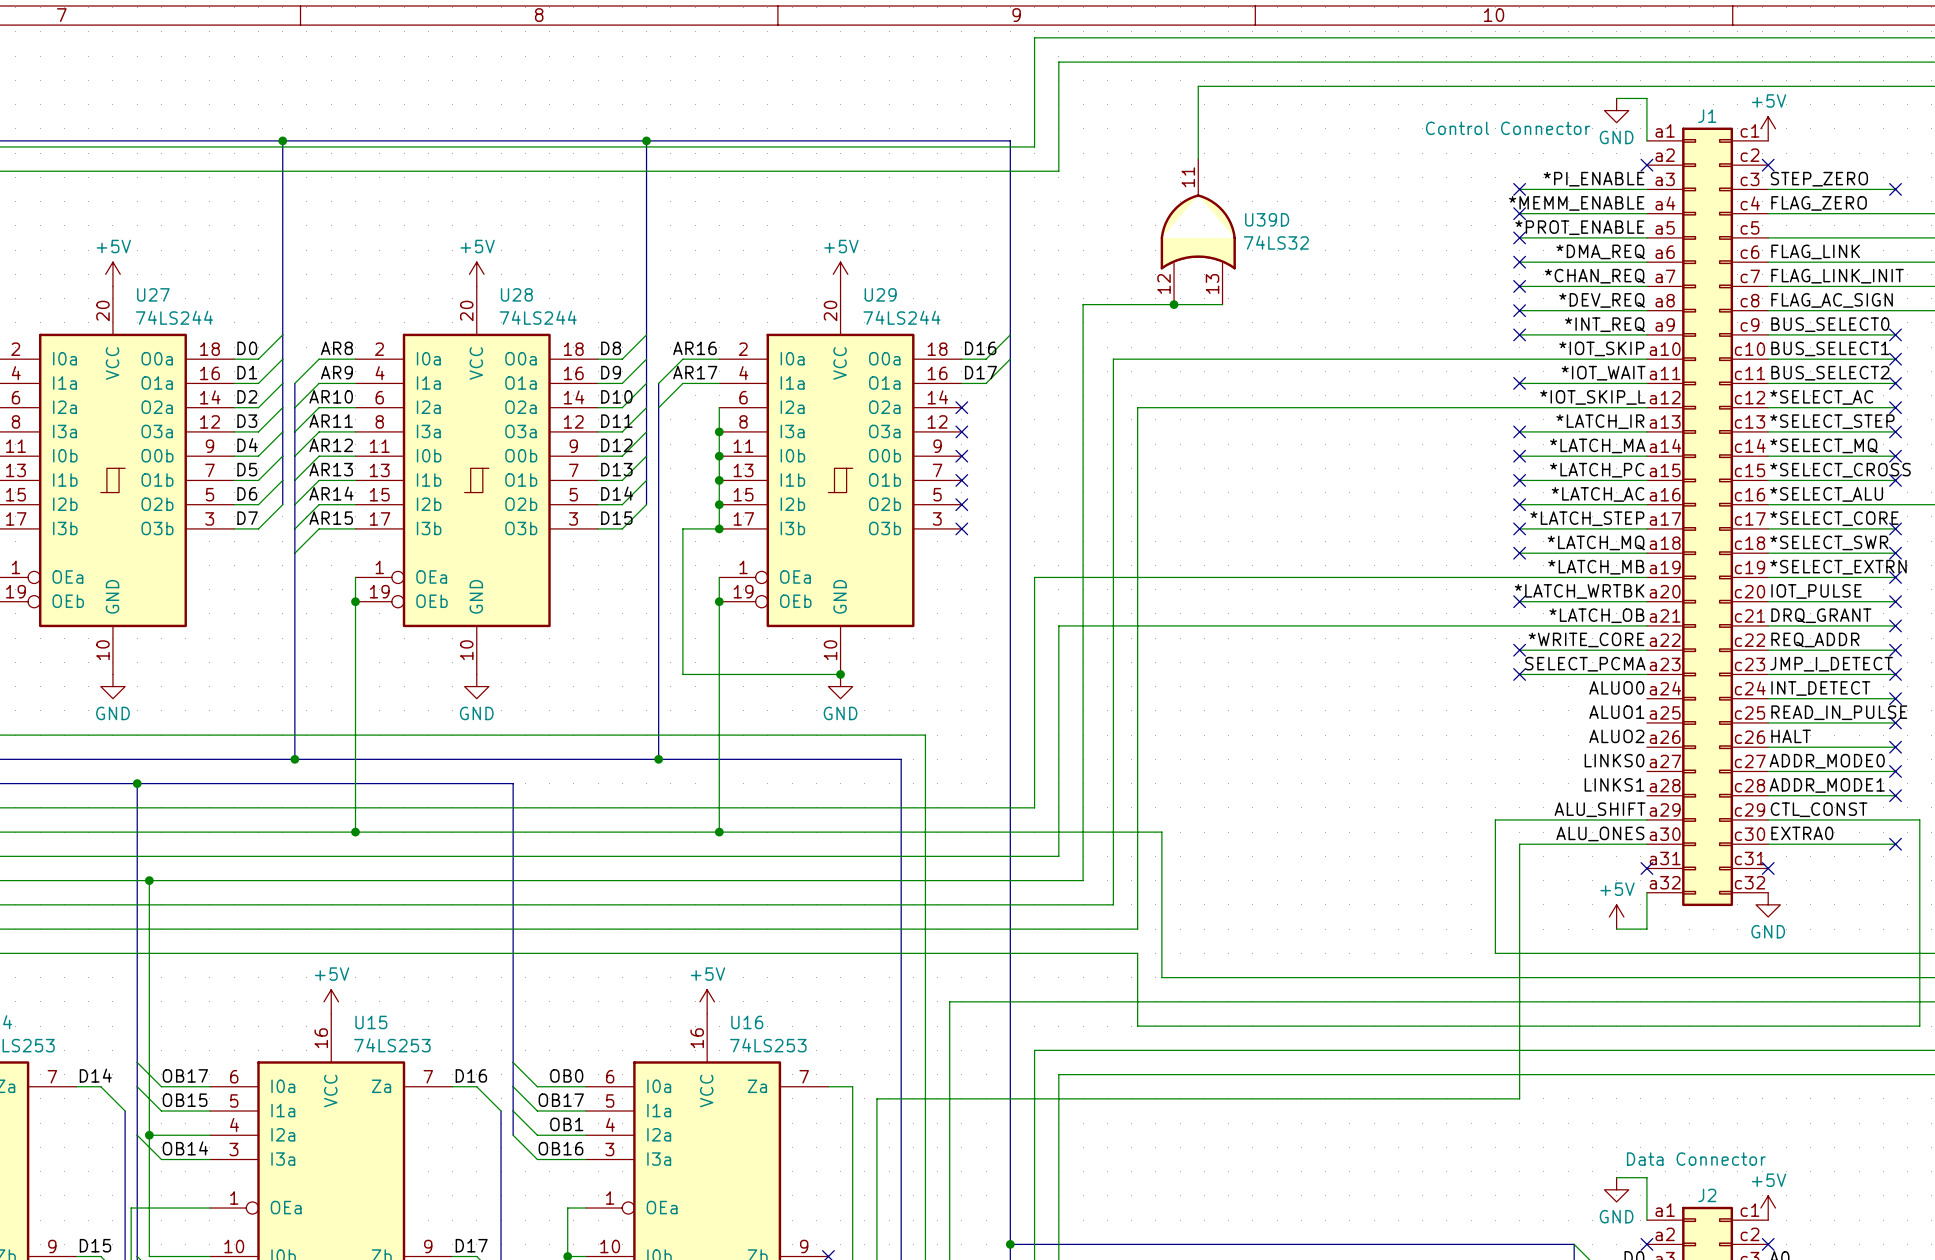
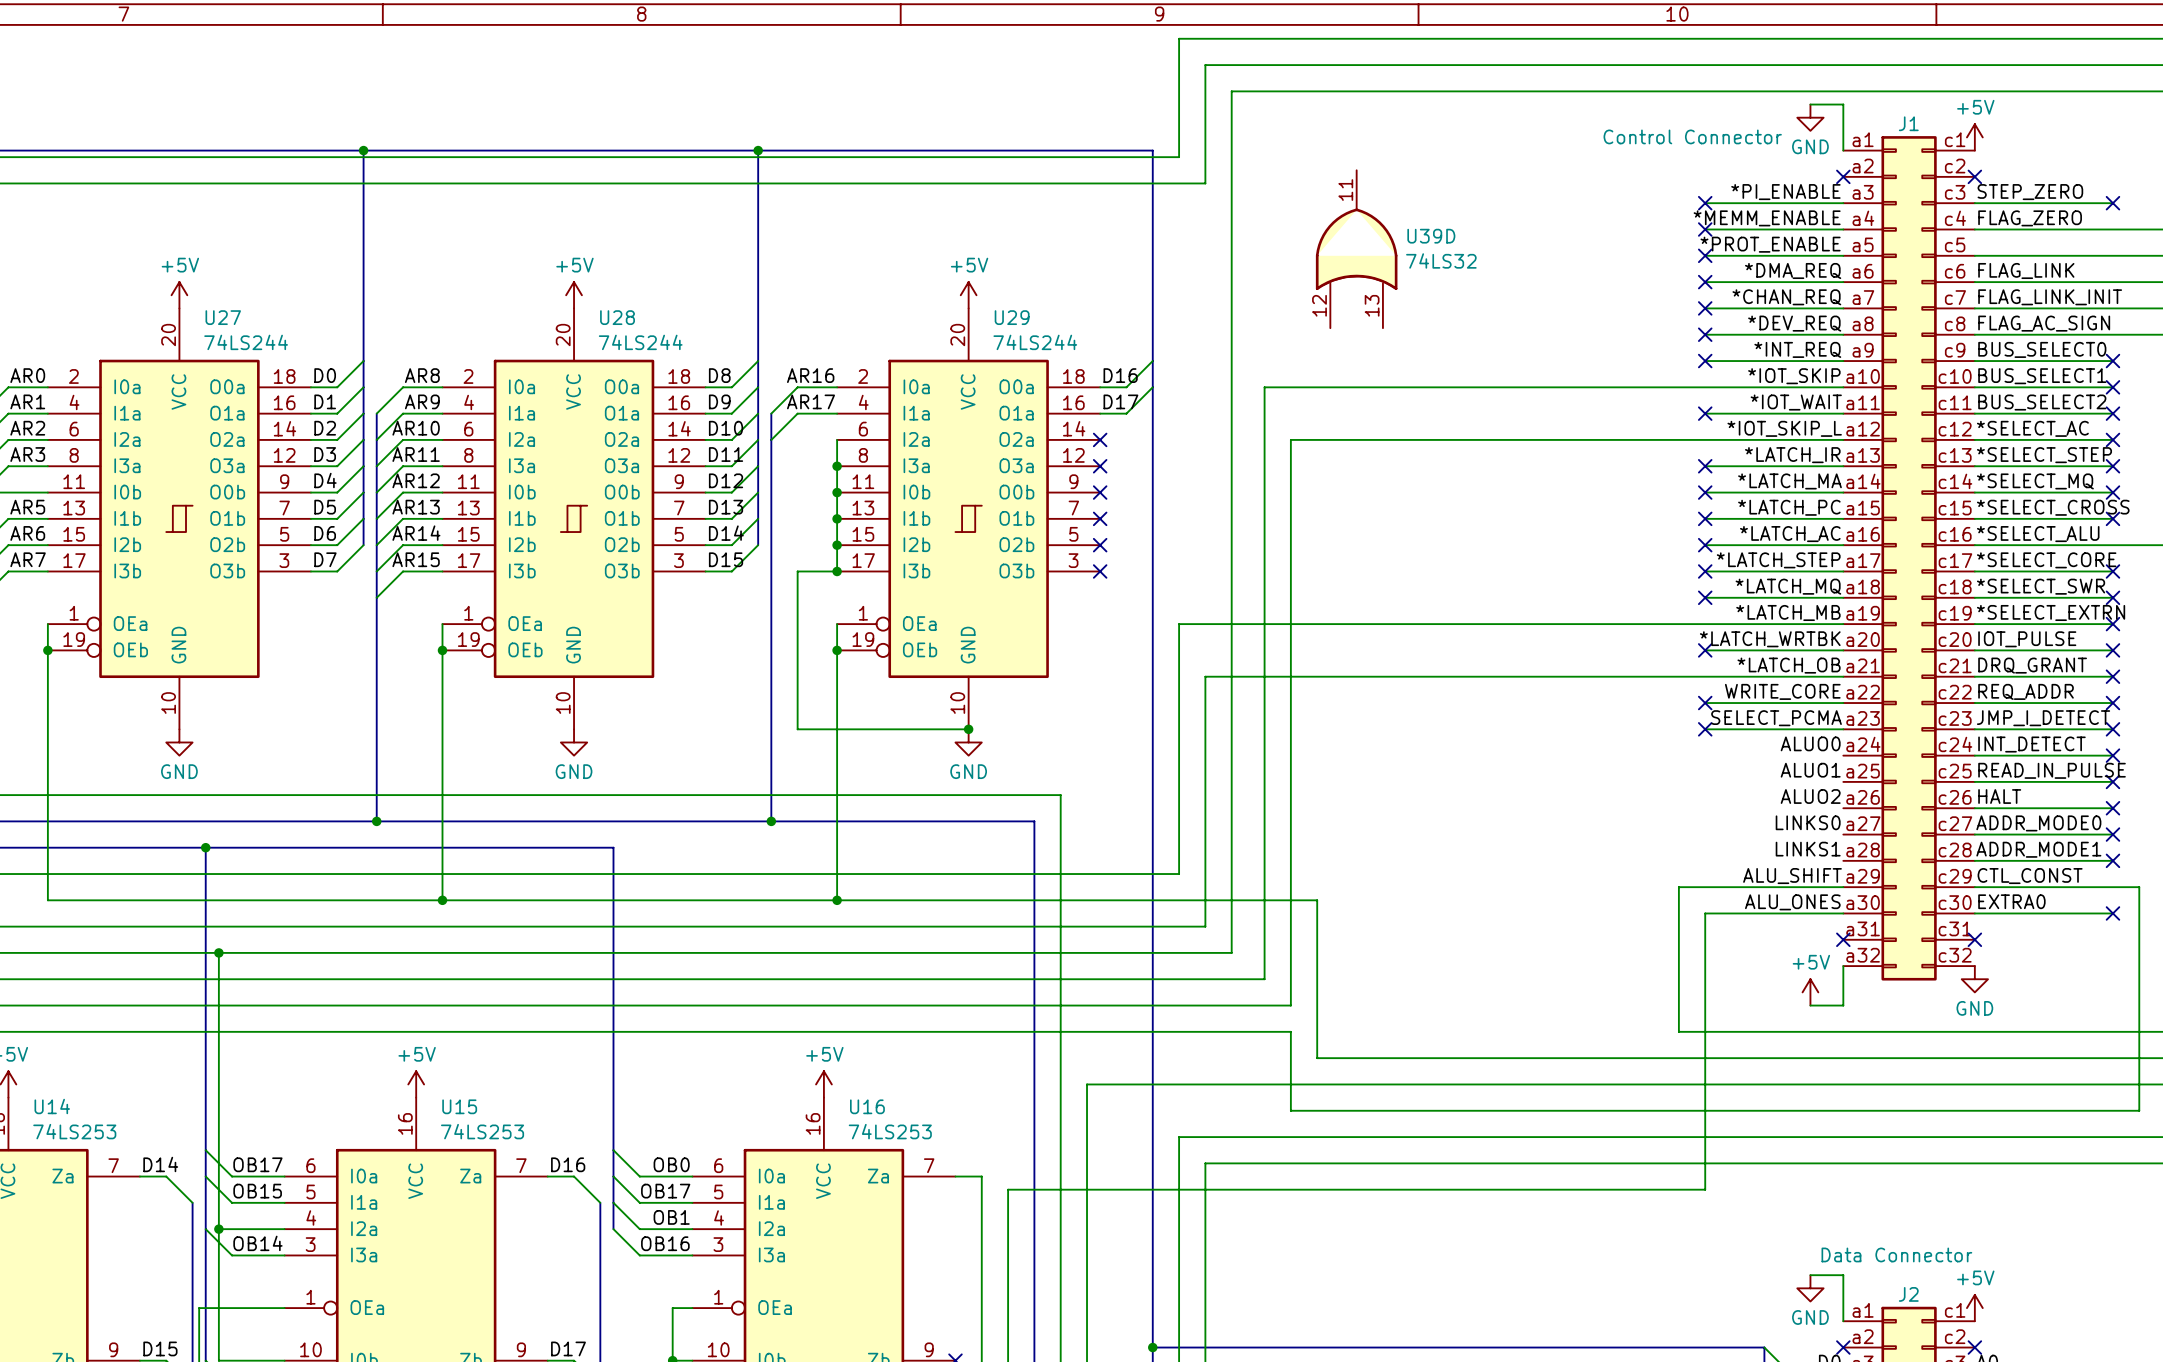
wire: (1198, 86) (1198, 159) -> (1356, 91) (1231, 91) (1231, 328)
wire: (1083, 304) (1222, 304) -> none
junction: (1174, 304) -> none
label: *WRITE_CORE (1586, 639) -> WRITE_CORE (1782, 691)

